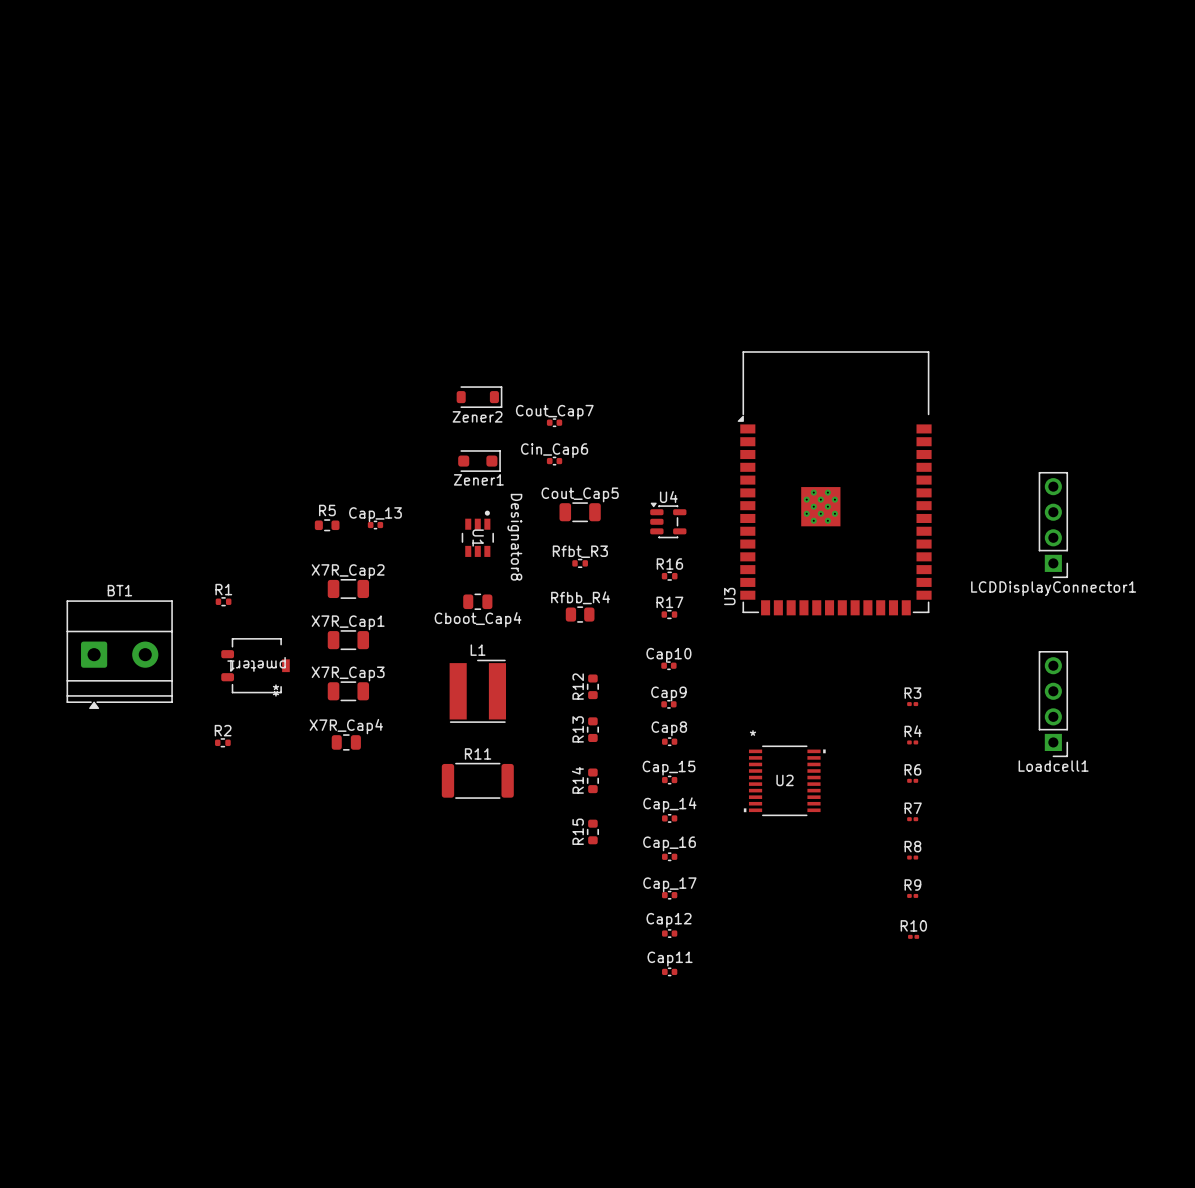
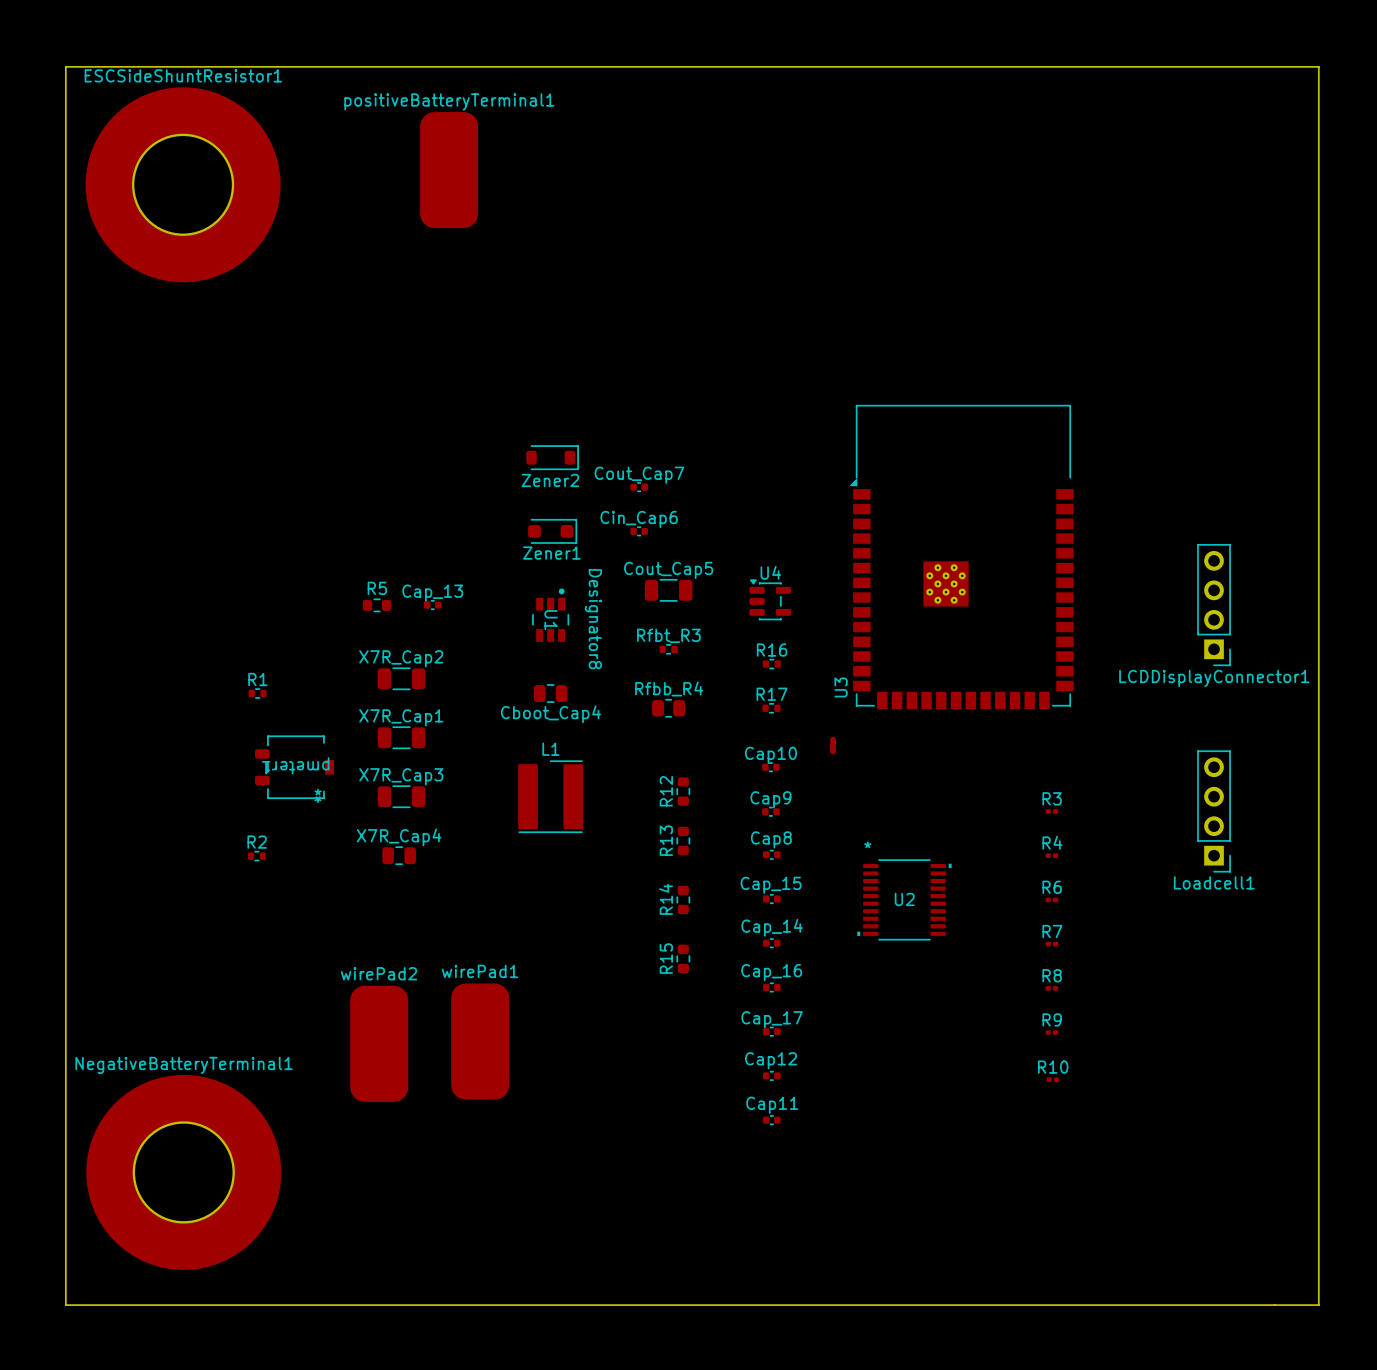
board edge: none -> (65, 66) (65, 1305) (1318, 1305) (1318, 66) (65, 66)
positiveBatteryTerminal1: none -> (449, 170)
ESCSideShuntResistor1: none -> (183, 184)
part: none -> (833, 745)
BT1: (119, 654) -> none
R11: (477, 780) -> none
wirePad1: none -> (480, 1041)
wirePad2: none -> (379, 1043)
NegativeBatteryTerminal1: none -> (183, 1172)

